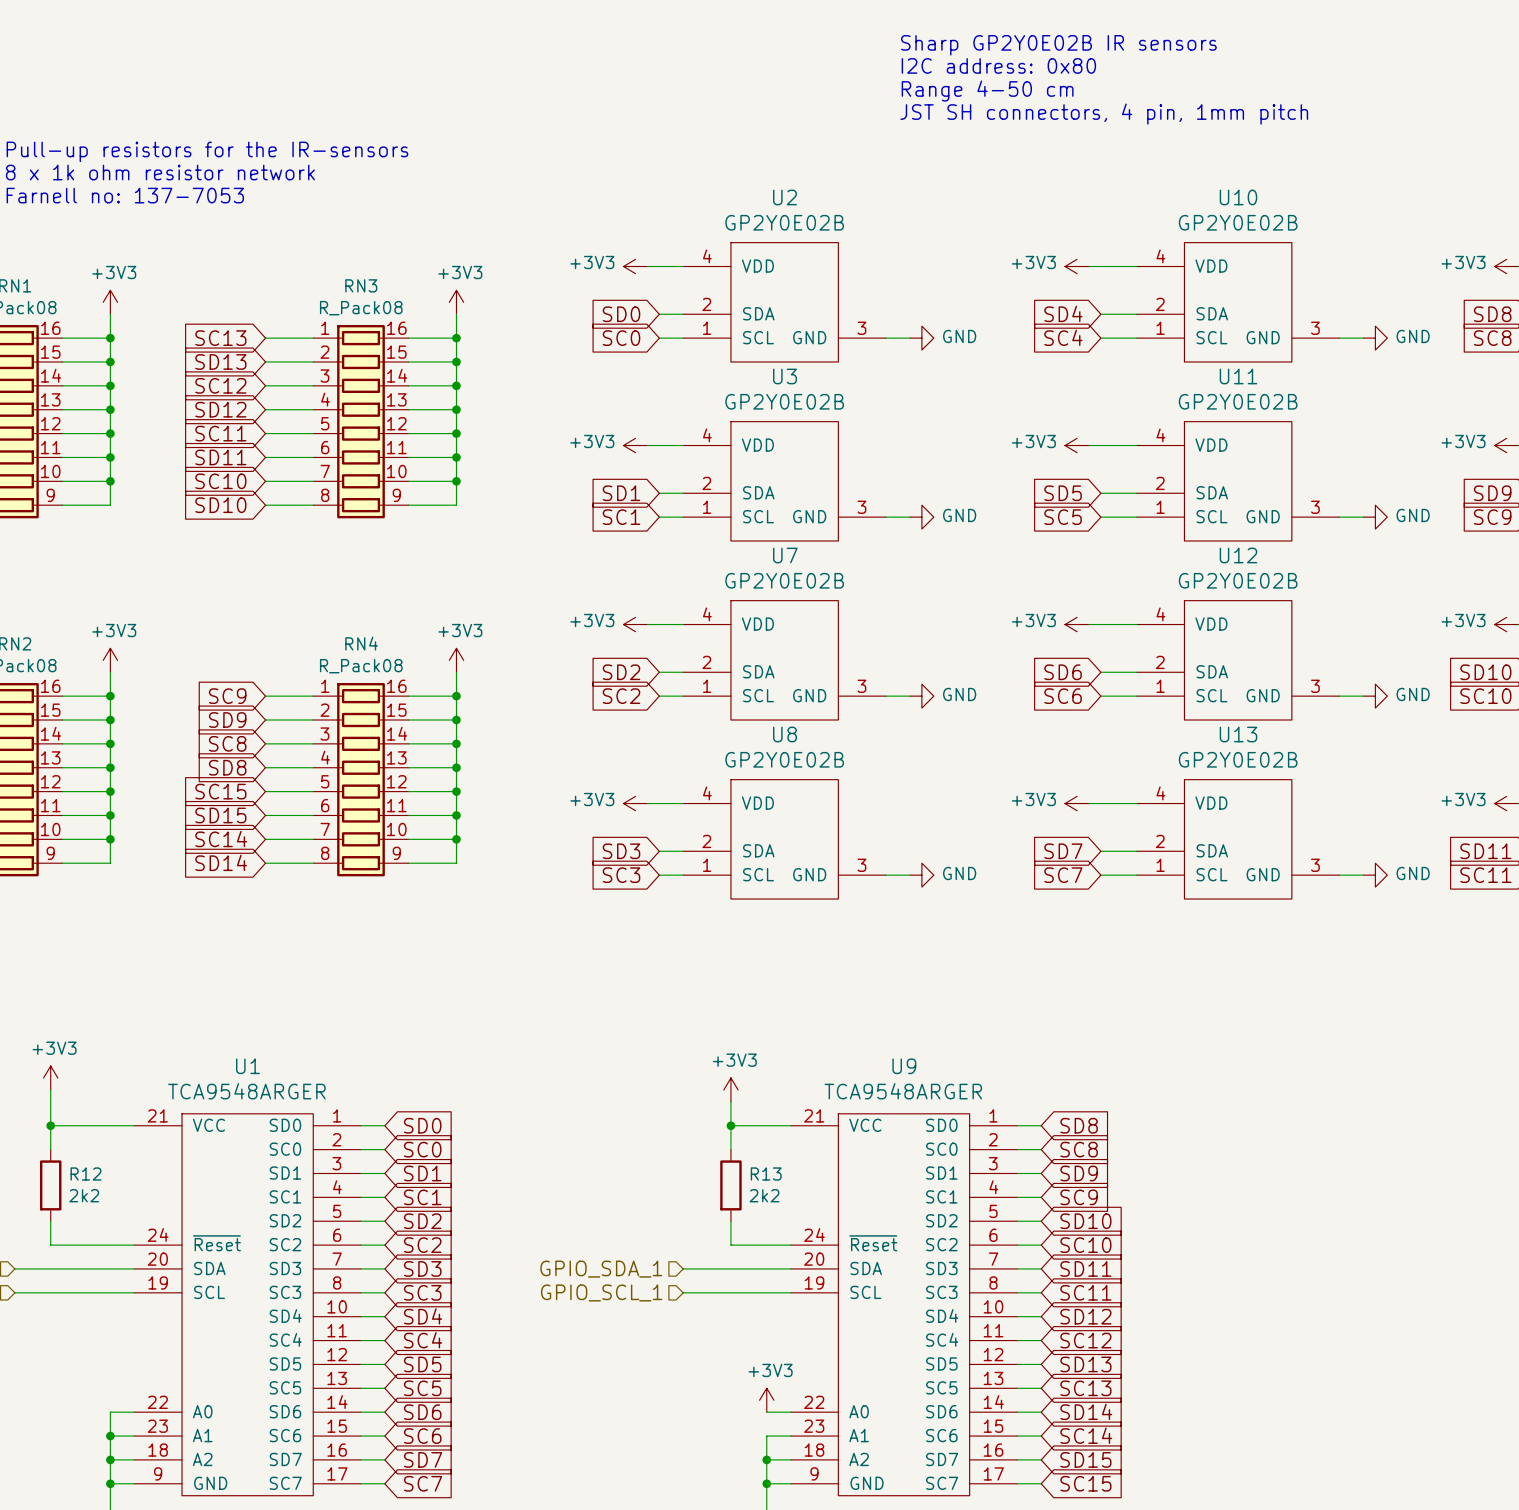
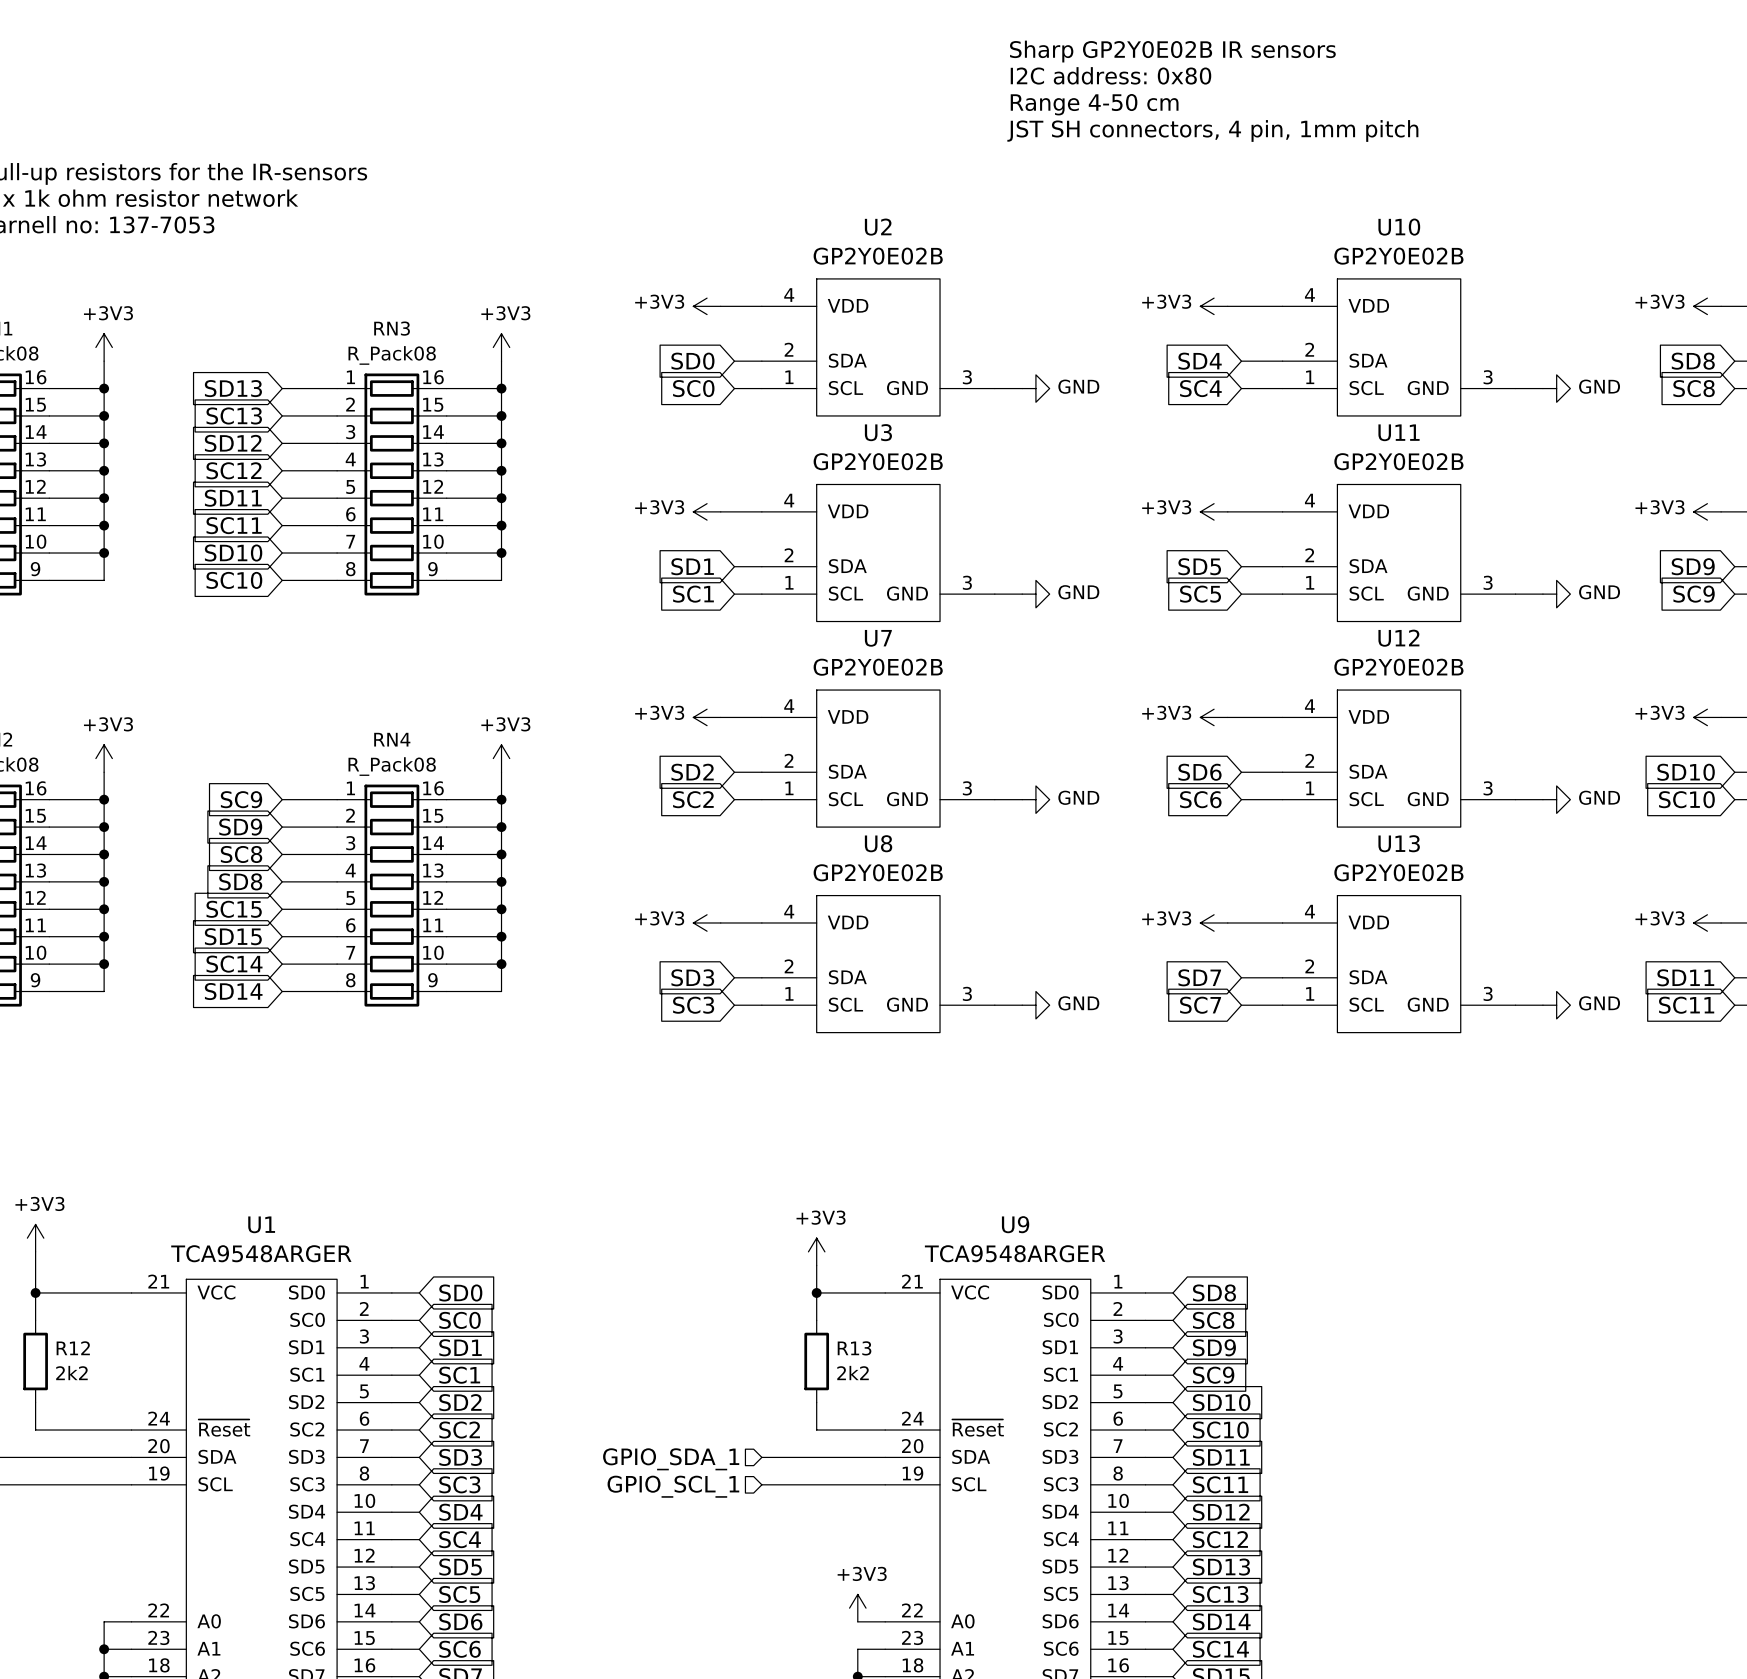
global label: SC13 (220, 338) -> SD13 (233, 388)
global label: SD13 (220, 361) -> SC13 (234, 415)
global label: SC12 (220, 385) -> SD12 (233, 443)
global label: SD12 (220, 409) -> SC12 (233, 470)
global label: SC11 (220, 433) -> SD11 (233, 498)
global label: SD11 (220, 457) -> SC11 (234, 525)
global label: SC10 (220, 481) -> SD10 (233, 553)
global label: SD10 (220, 505) -> SC10 (234, 580)

